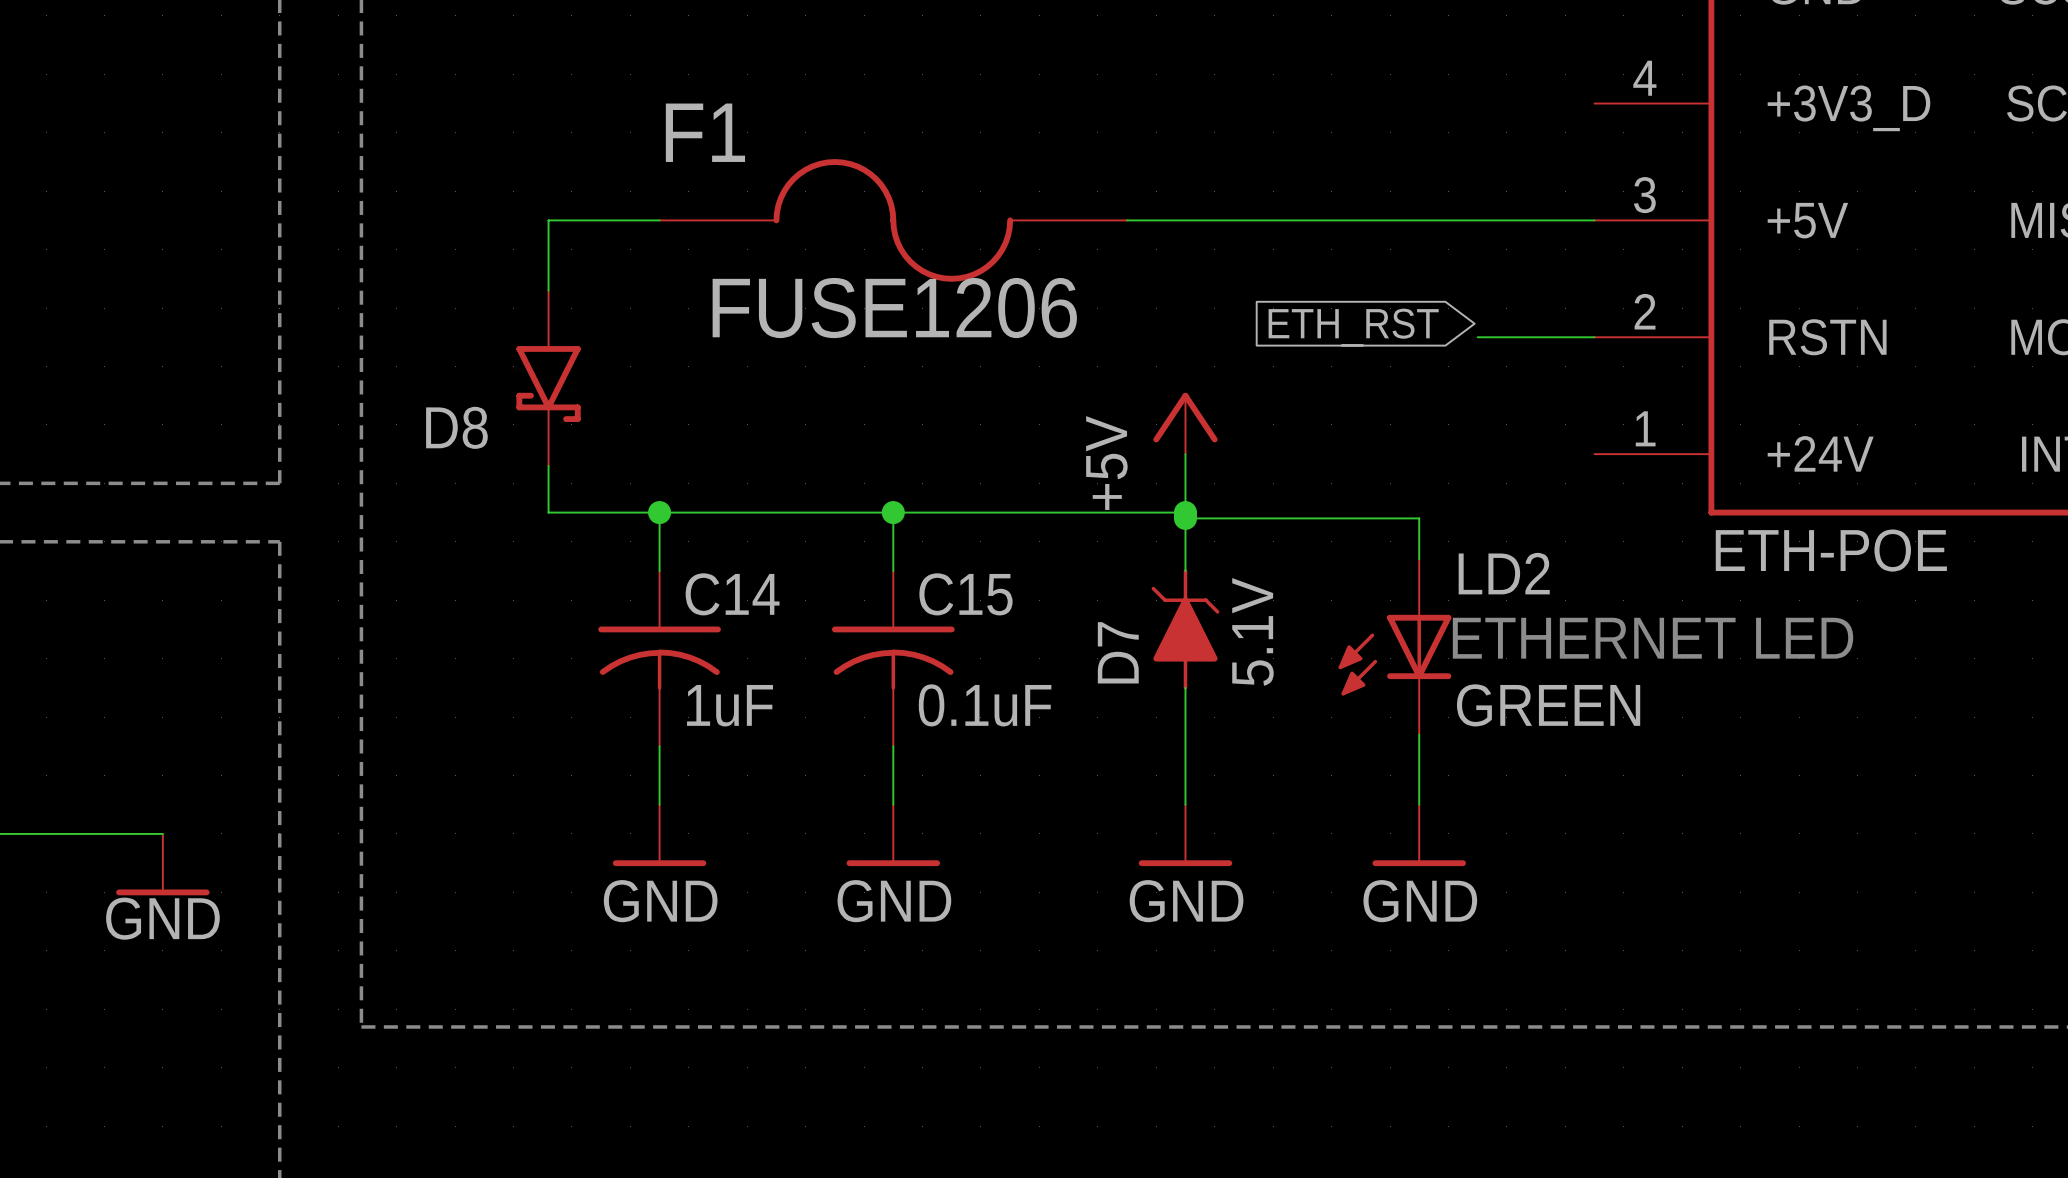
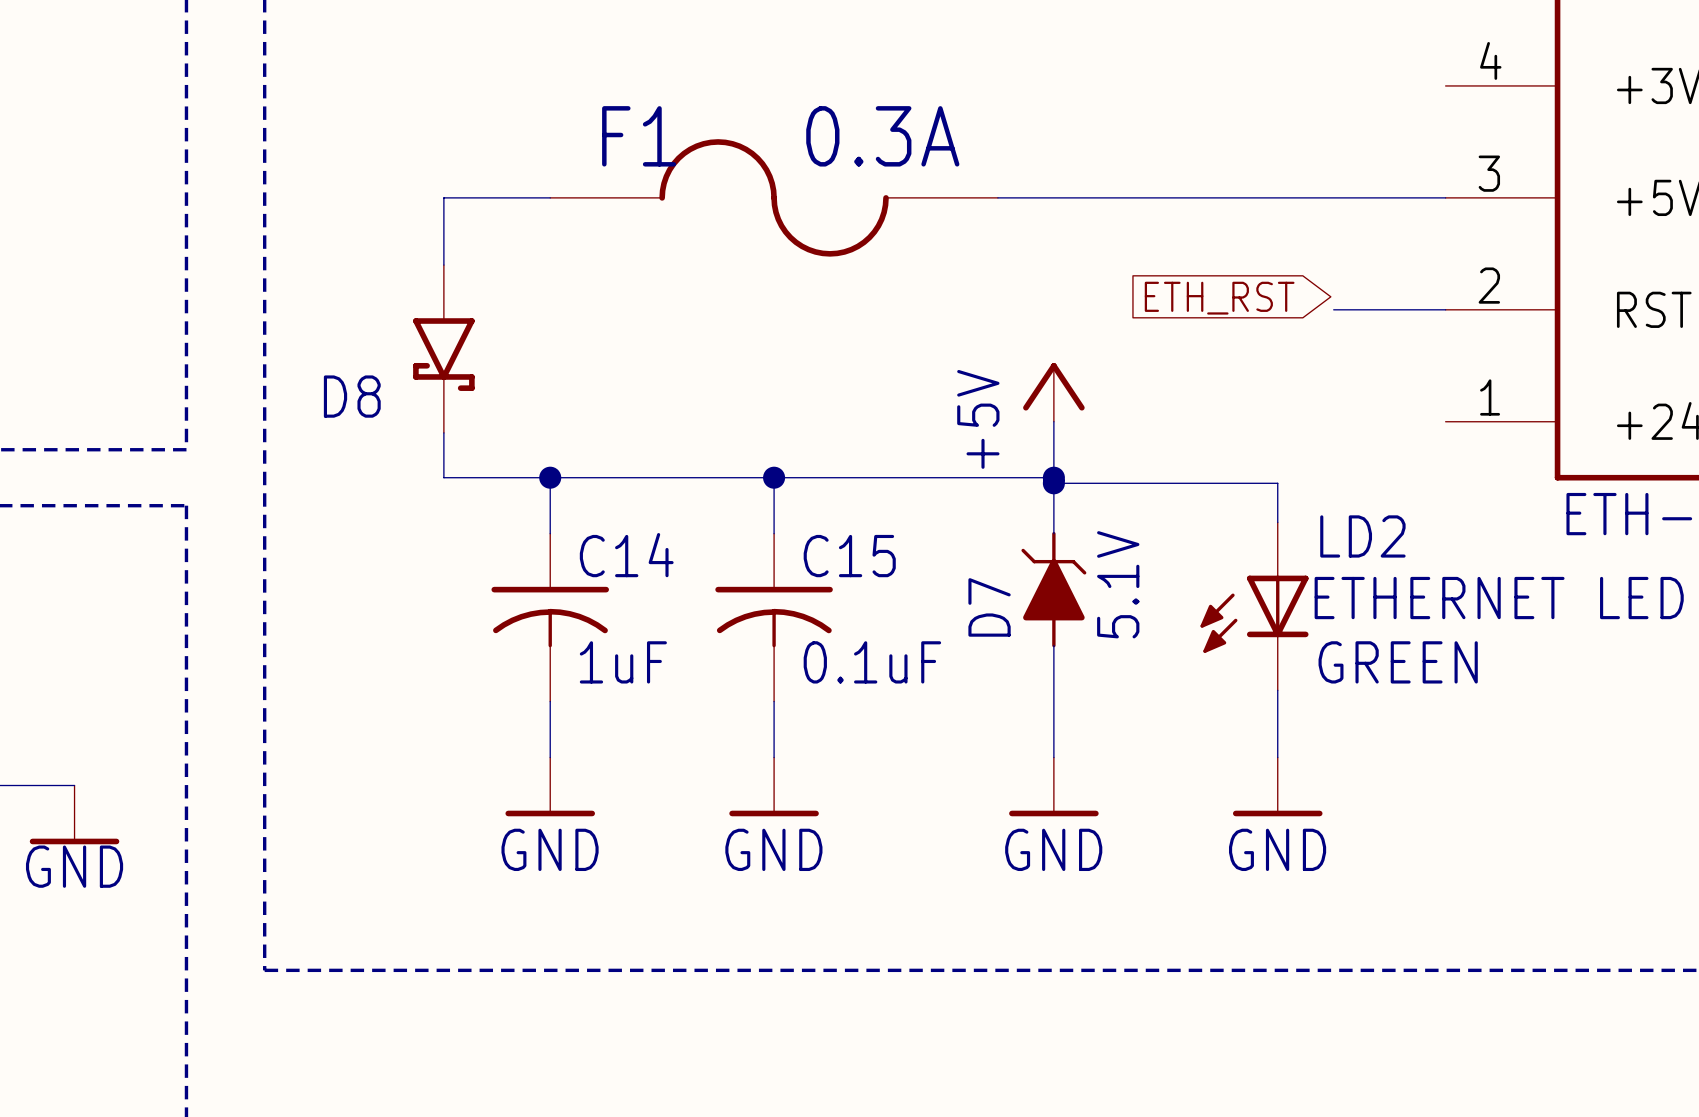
F1 name position: F1 (705, 132) -> F1 (639, 136)
F1 value: FUSE1206 (894, 308) -> 0.3A (882, 136)

